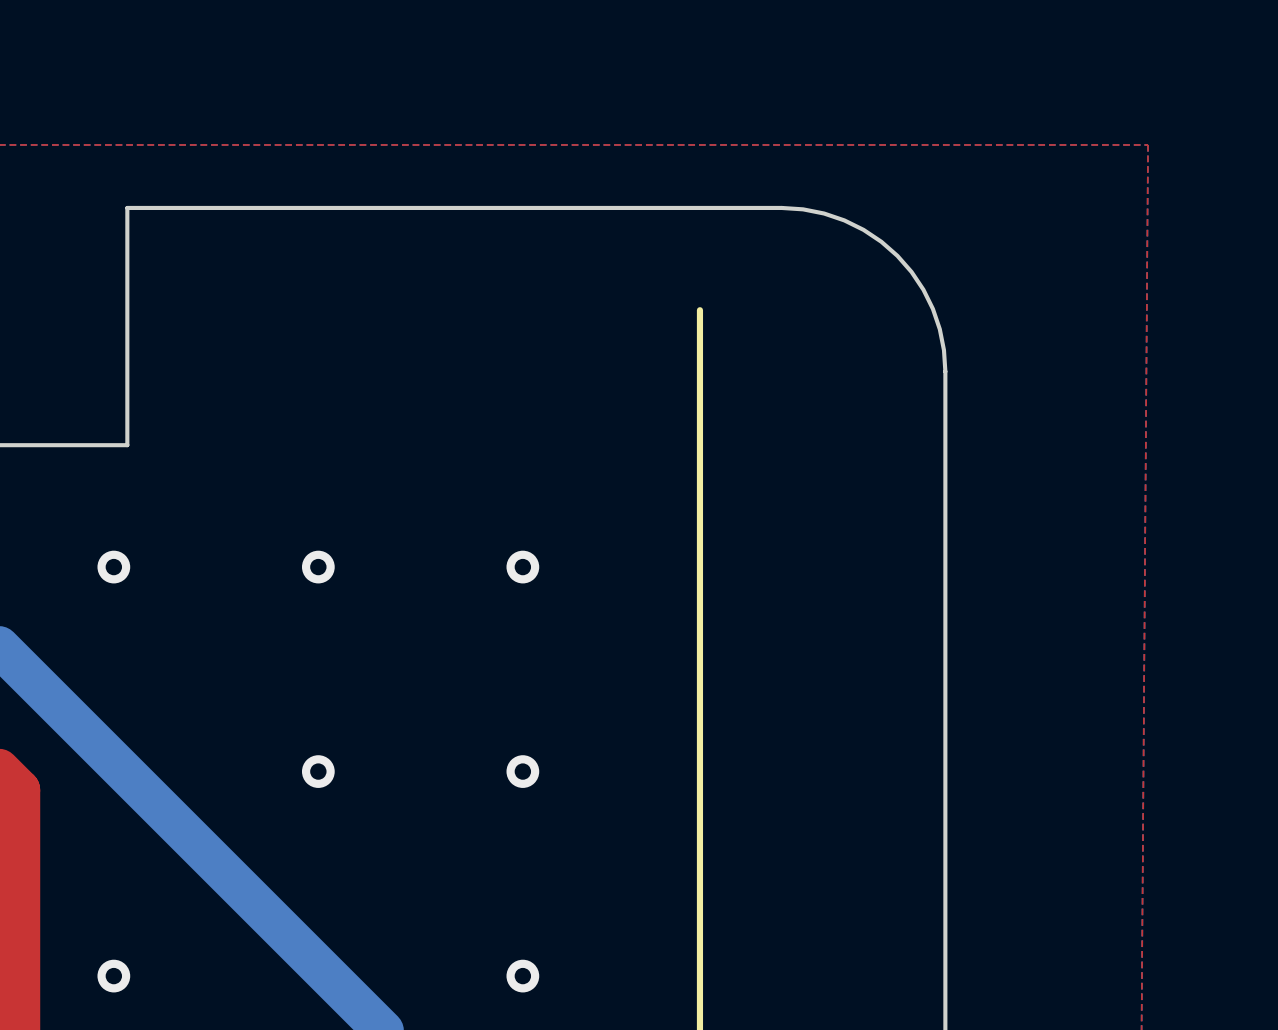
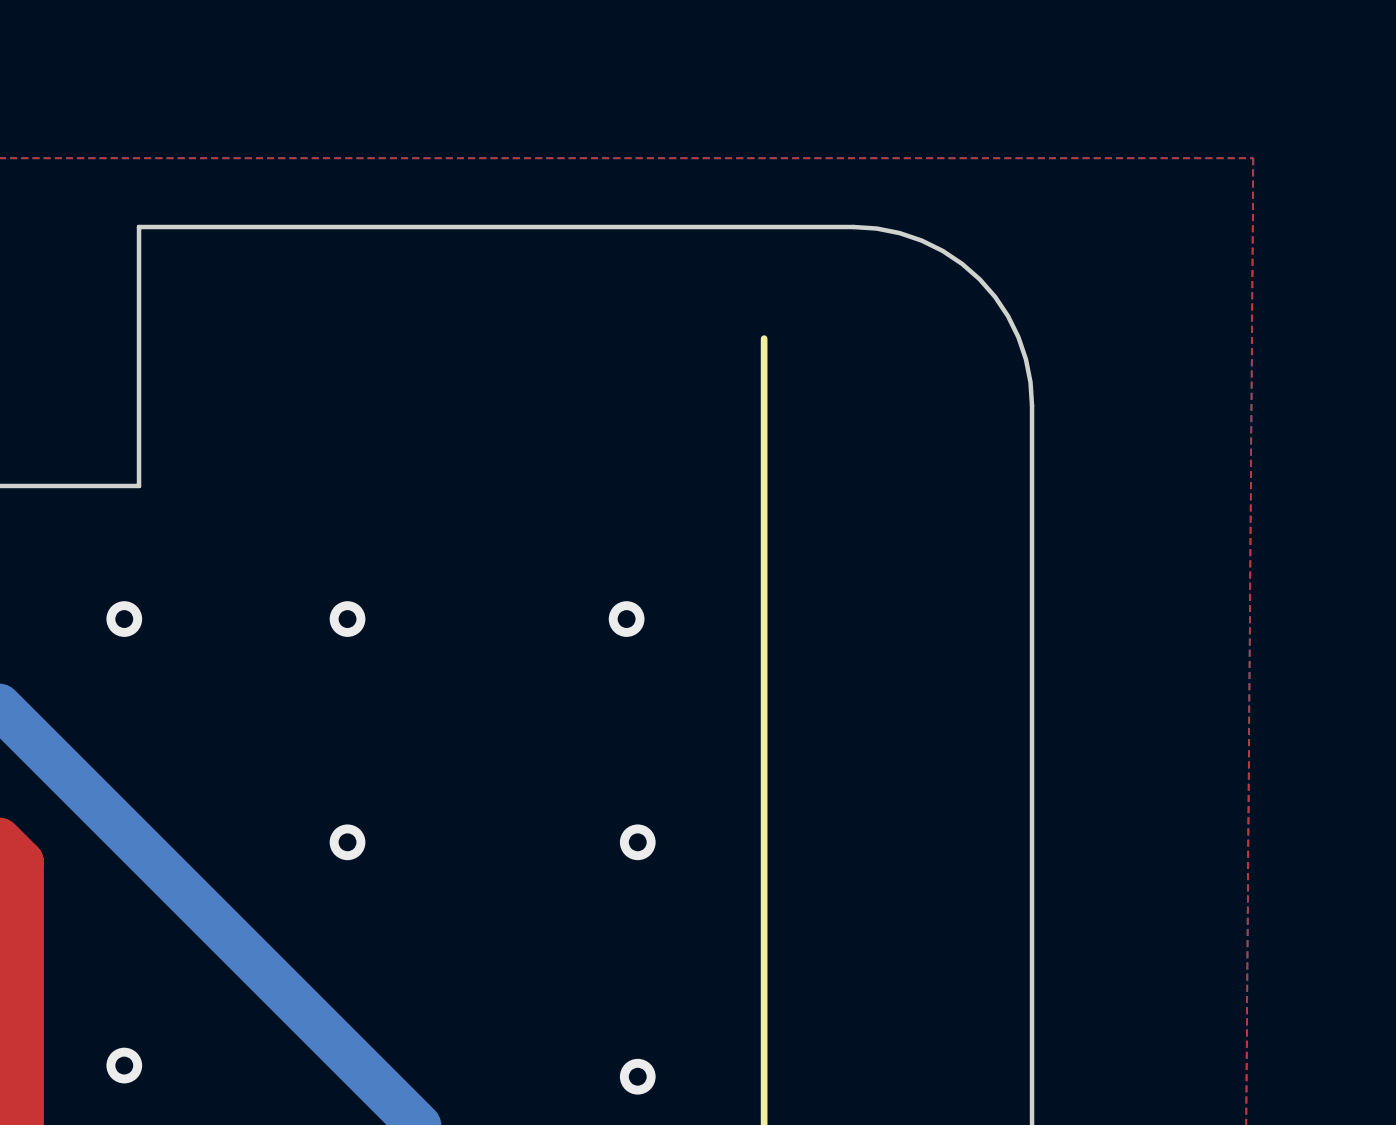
via position: (522, 567) -> (626, 619)
via position: (522, 771) -> (637, 842)
via position: (522, 976) -> (637, 1076)

